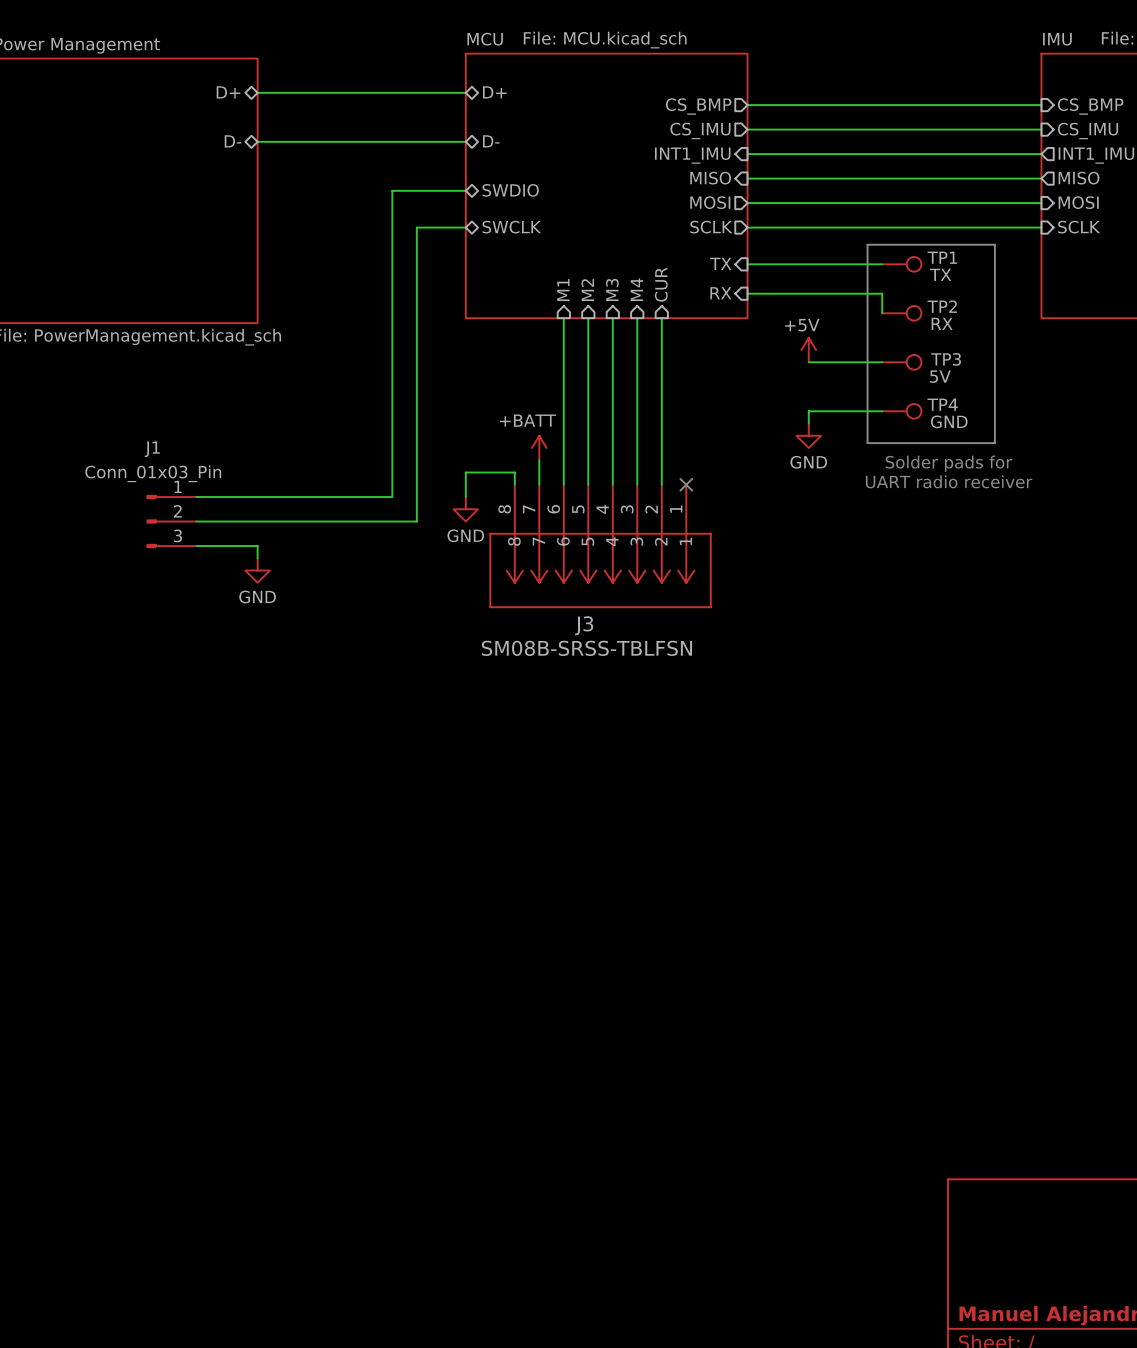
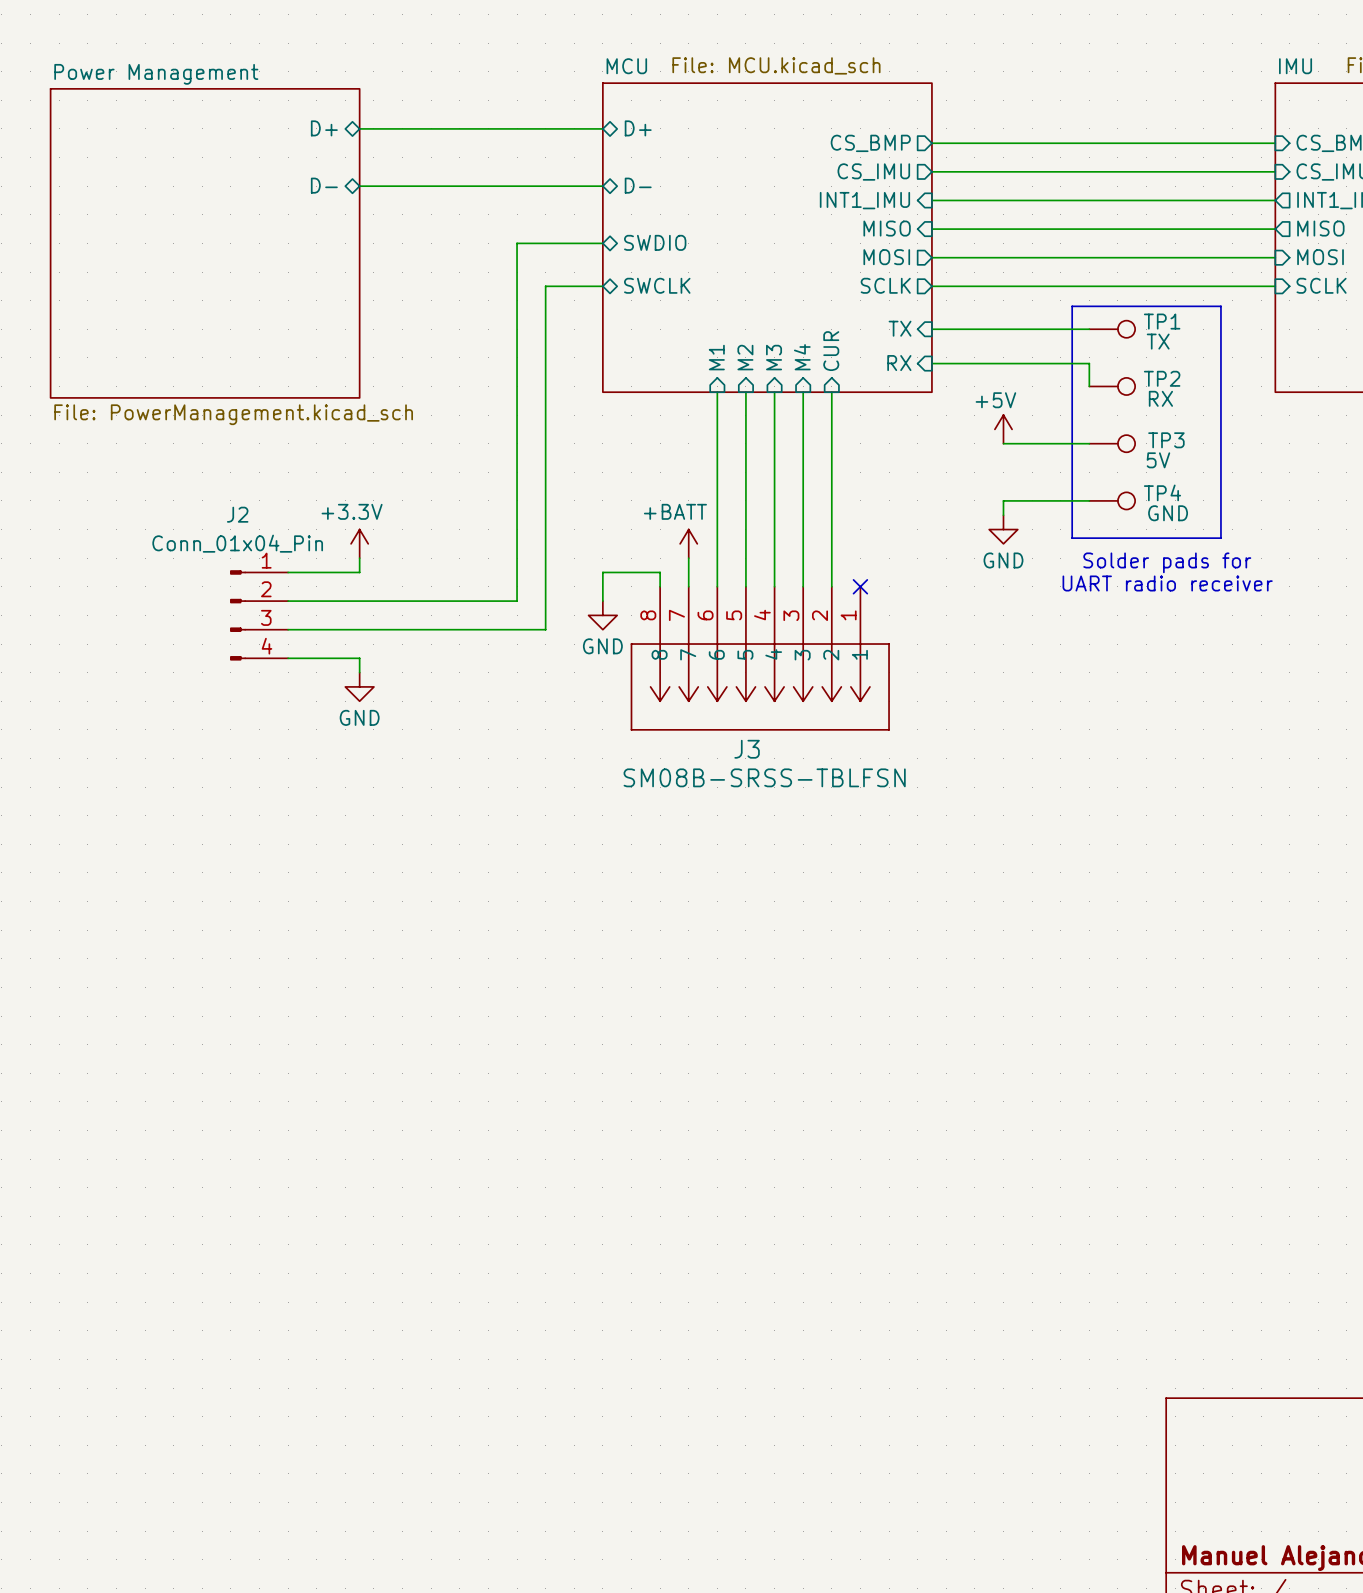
power symbol: none -> +3.3V (359, 543)
wire: none -> (359, 558) (359, 572) (288, 572)
J2: none -> Conn_01x04_Pin (259, 615)
J1: Conn_01x03_Pin (171, 521) -> none

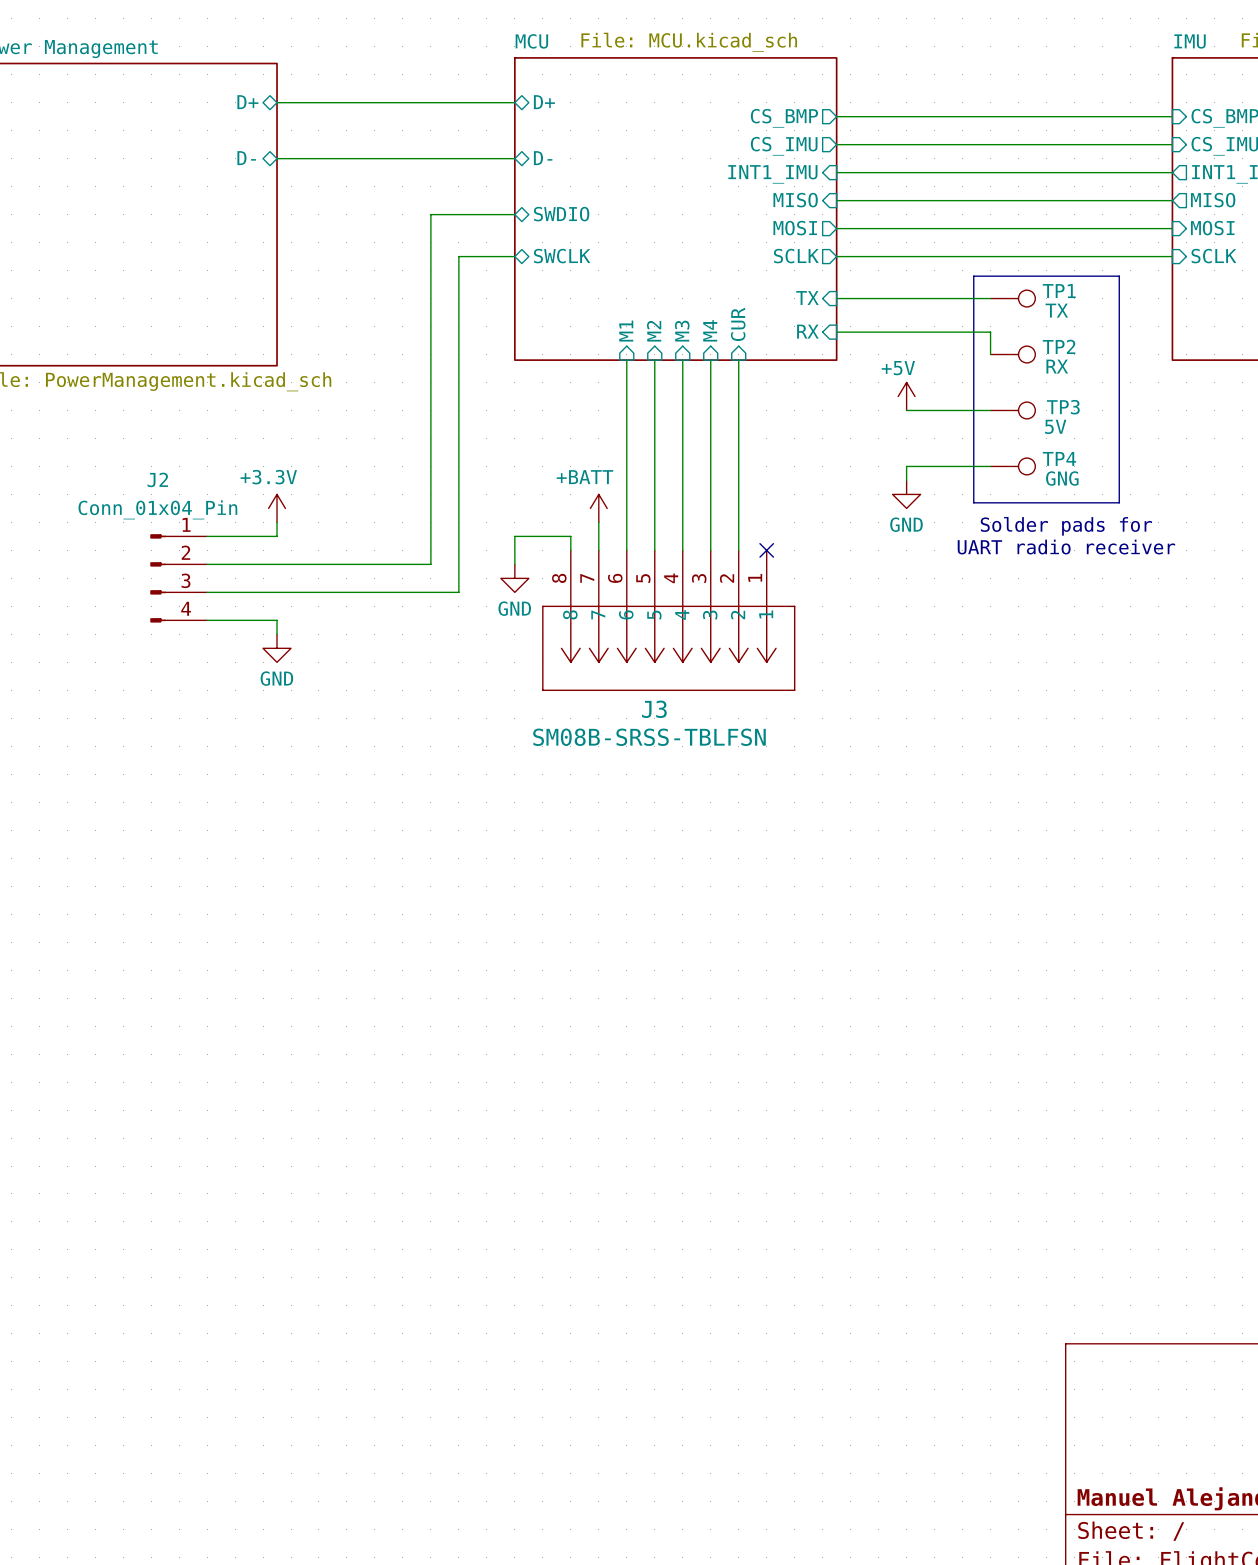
TP4 value: GND (1168, 513) -> GNG (1062, 478)

